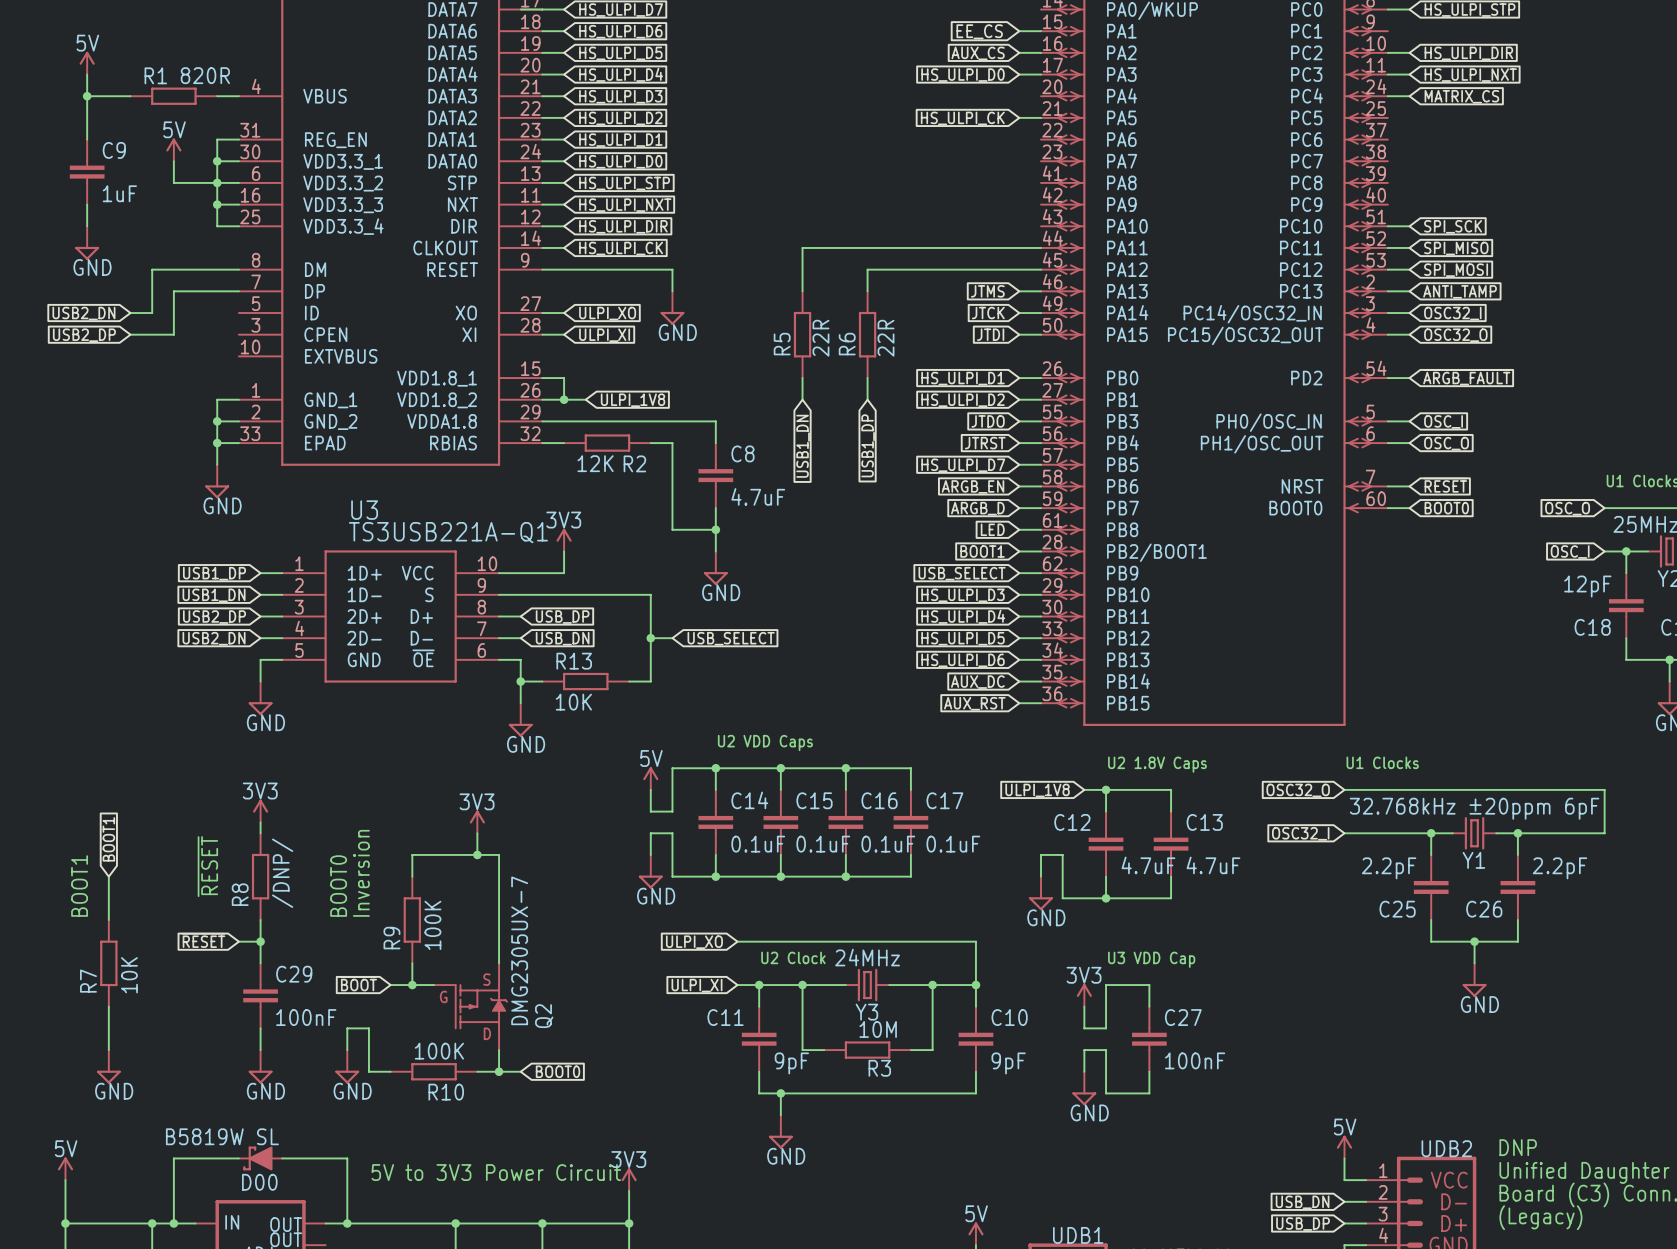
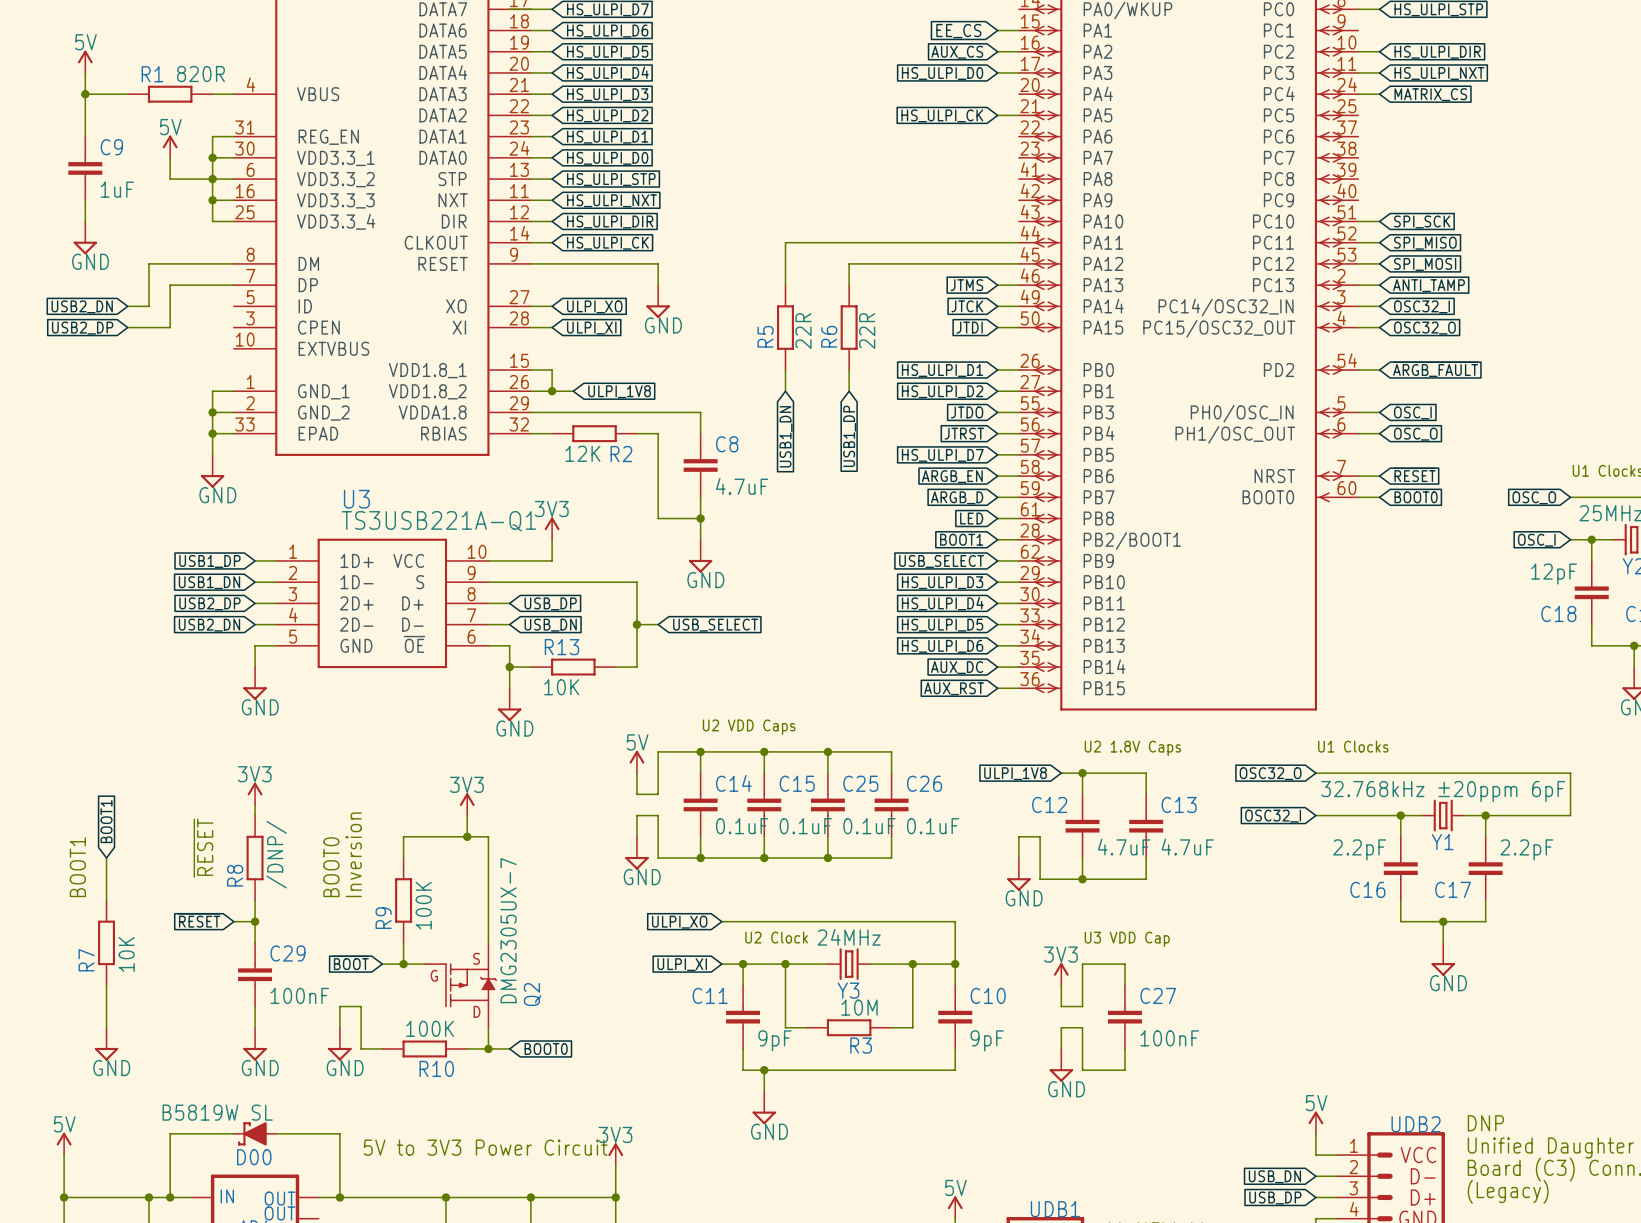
C16 name: C16 (879, 800) -> C25 (860, 783)
C17 name: C17 (944, 800) -> C26 (924, 783)
C25 name: C25 (1397, 909) -> C16 (1367, 889)
C26 name: C26 (1484, 909) -> C17 (1453, 889)

